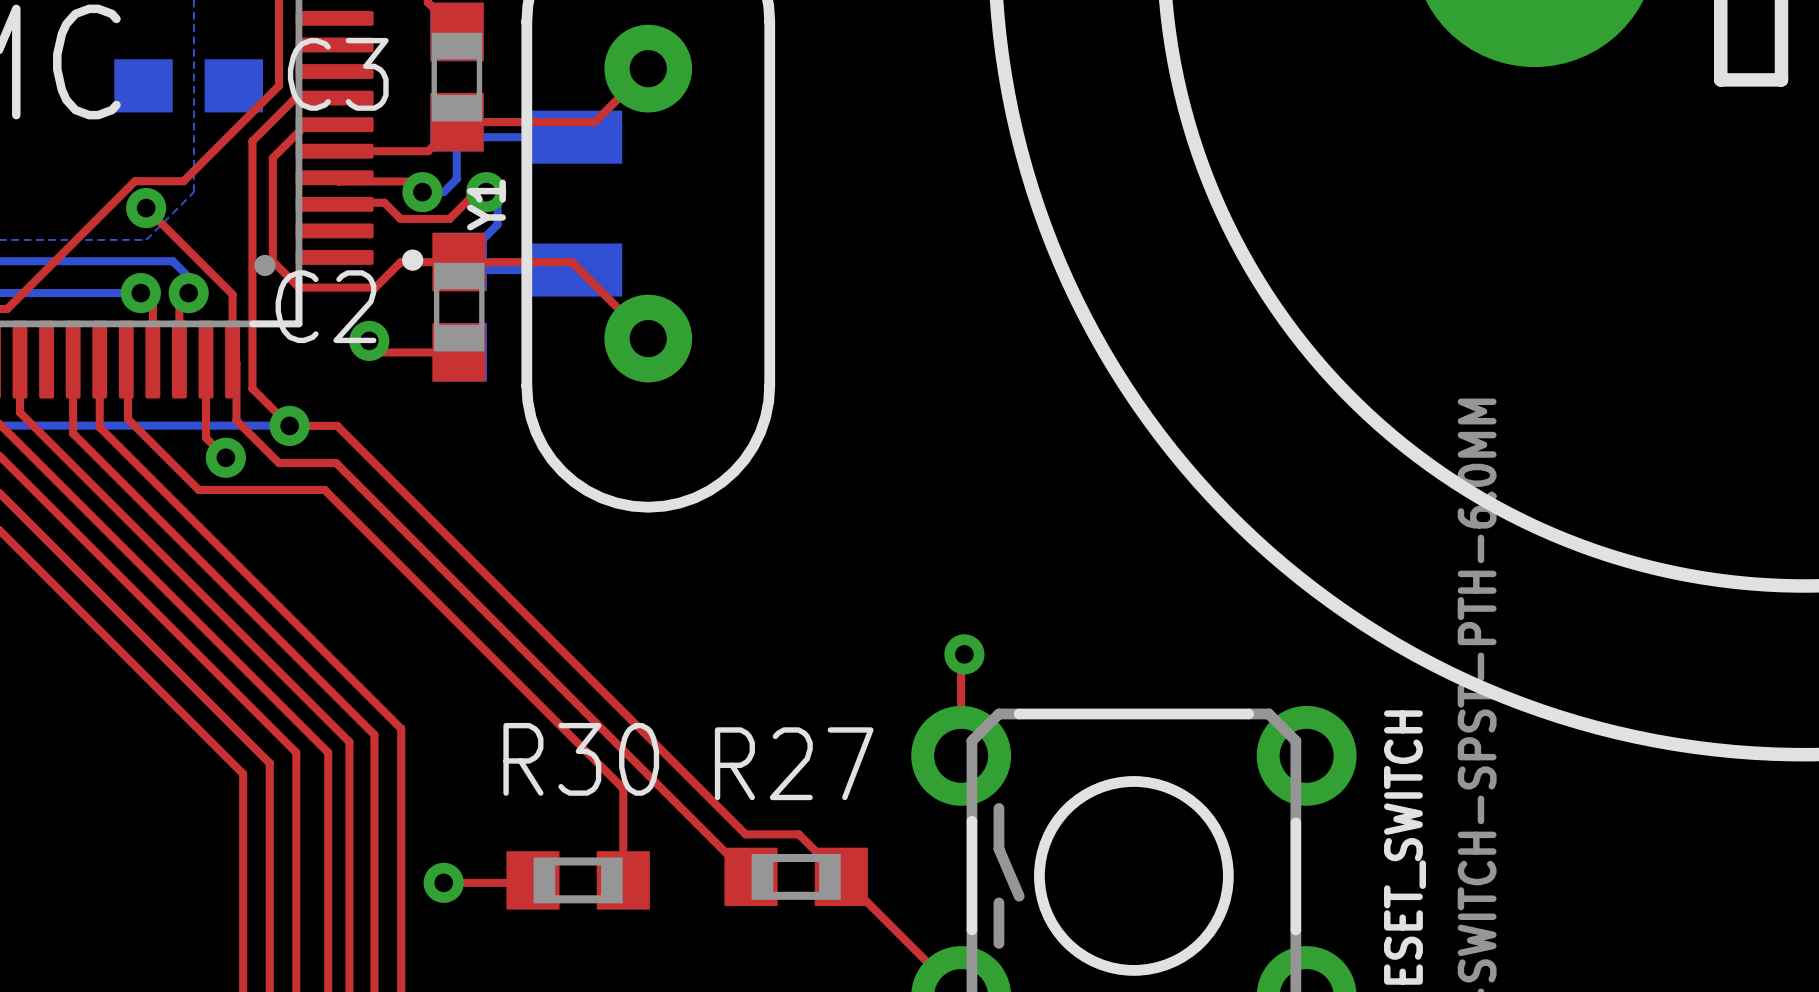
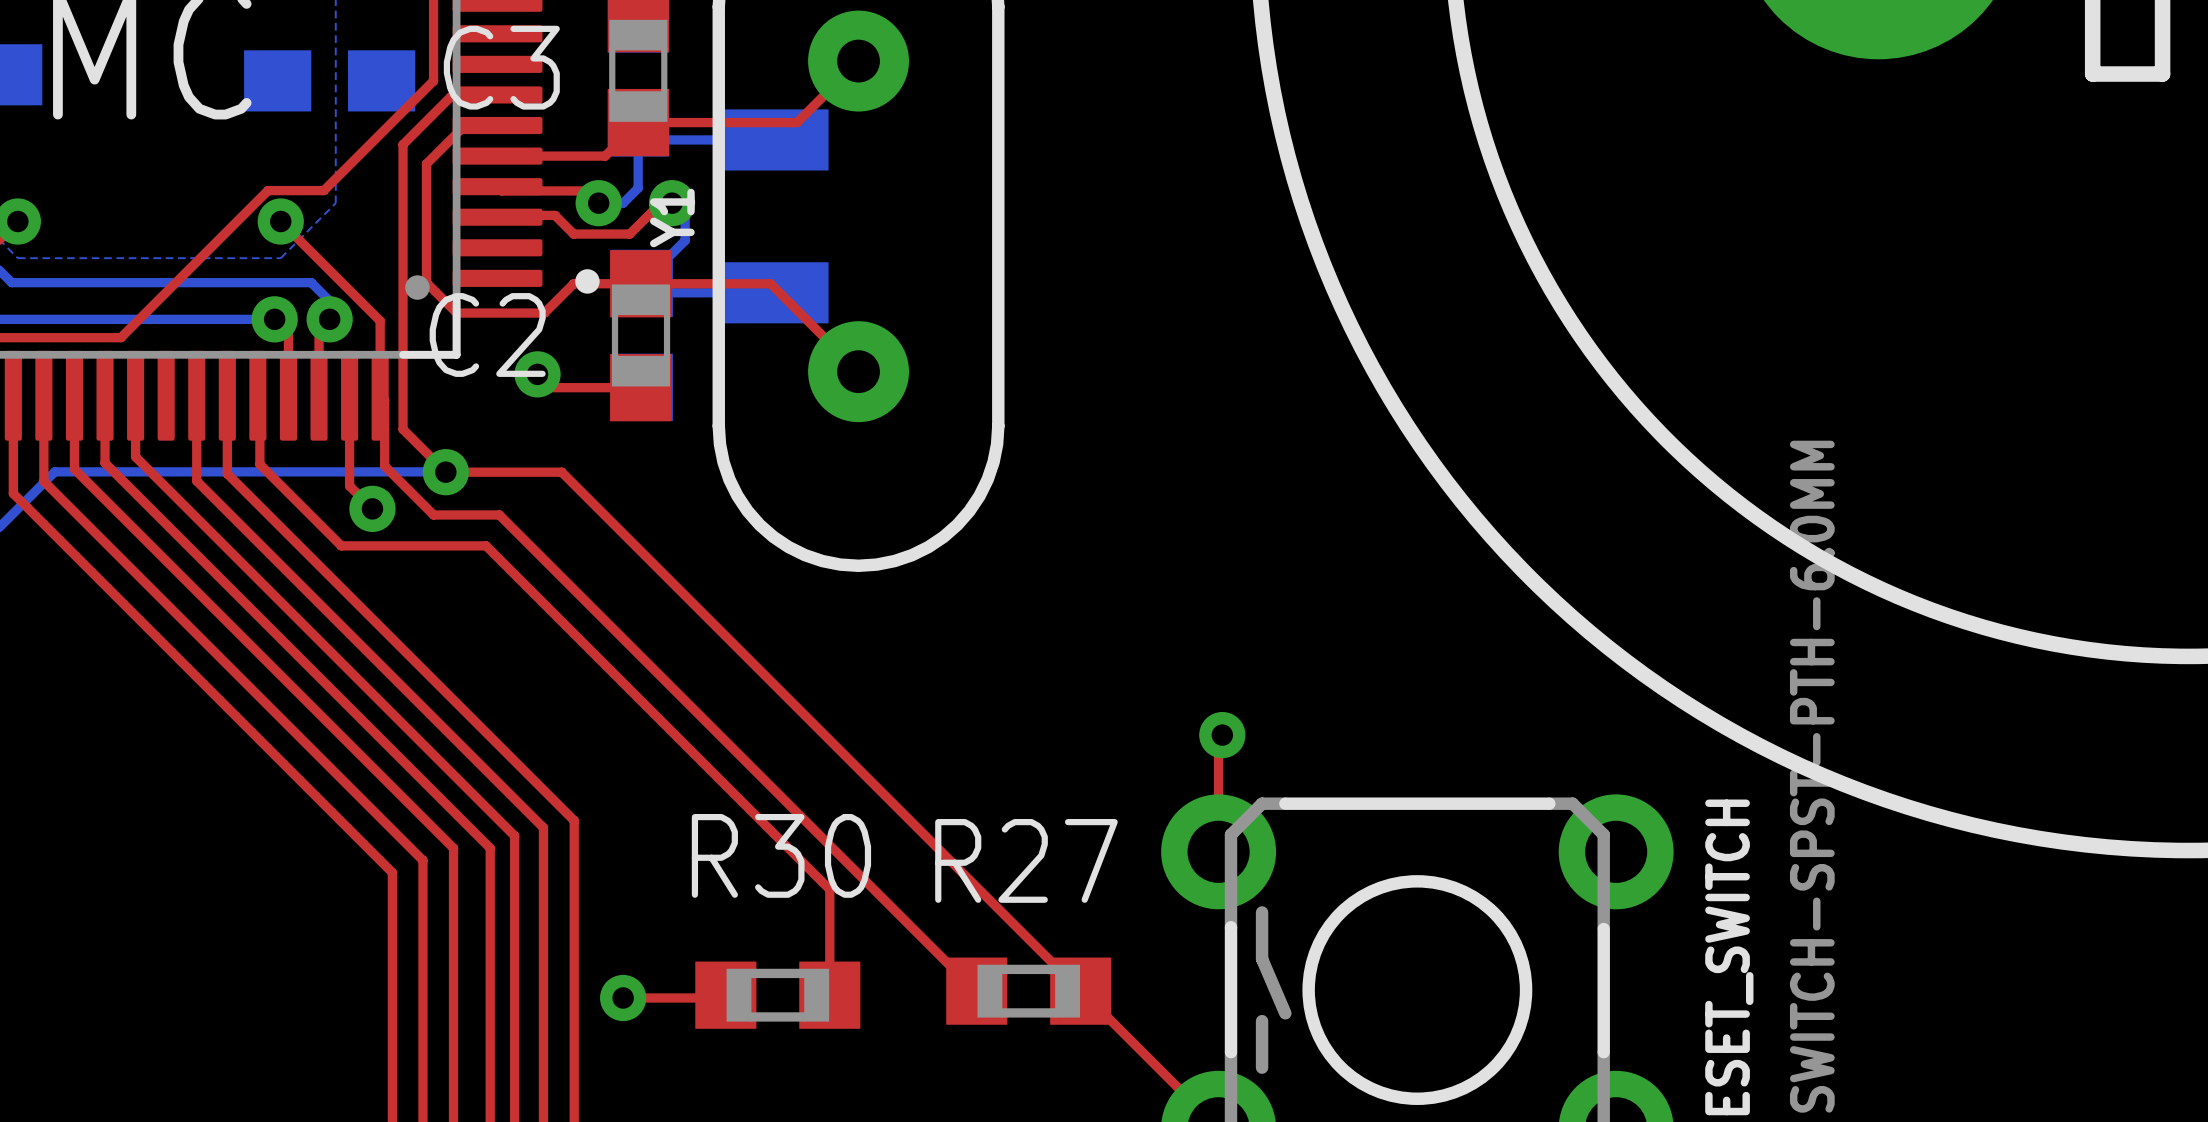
top track: (337, 425) (745, 834) (798, 834) -> (500, 472) (561, 472) (1031, 942)

